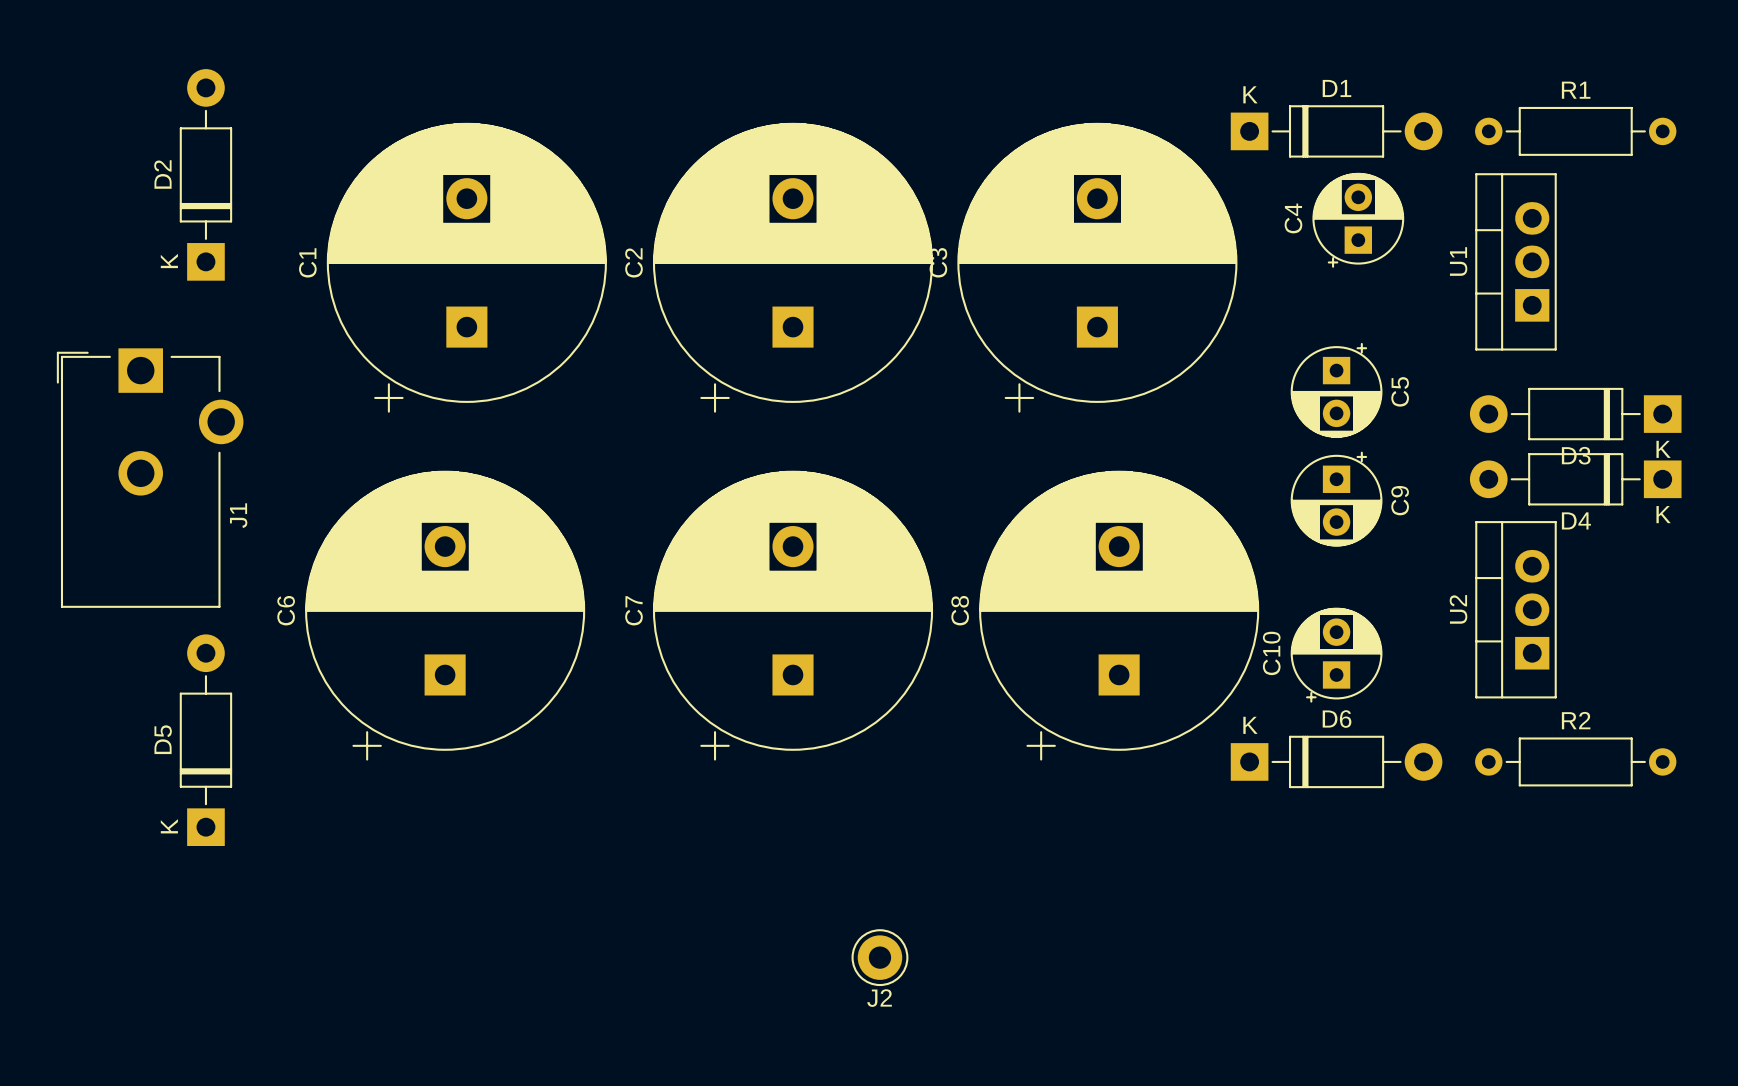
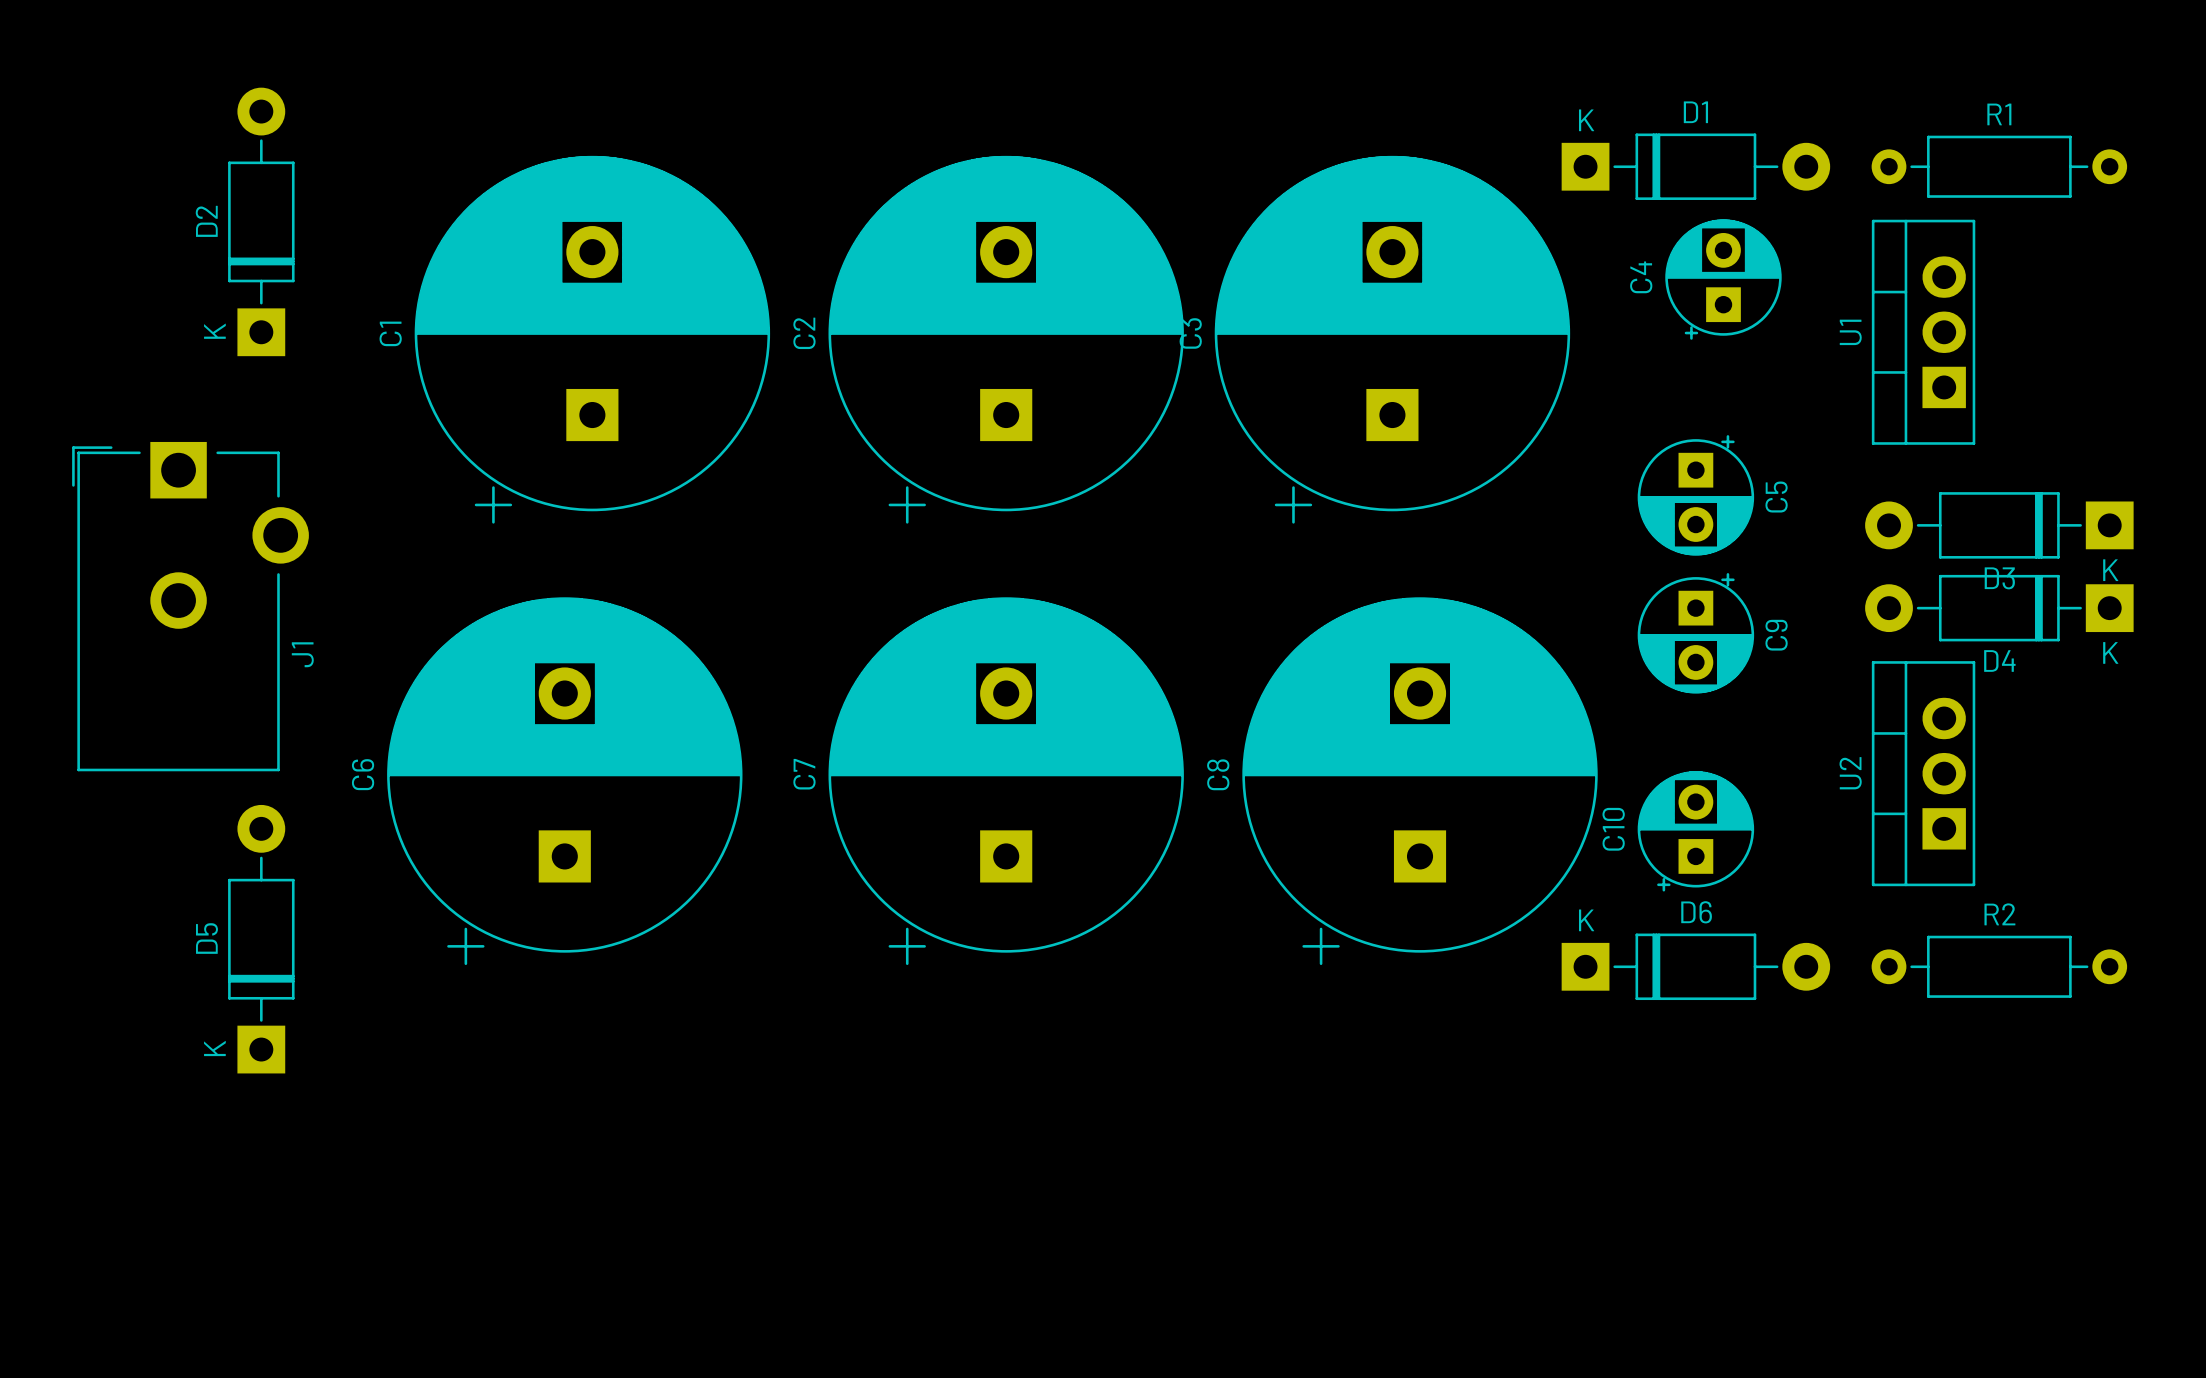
J2: (879, 957) -> none

